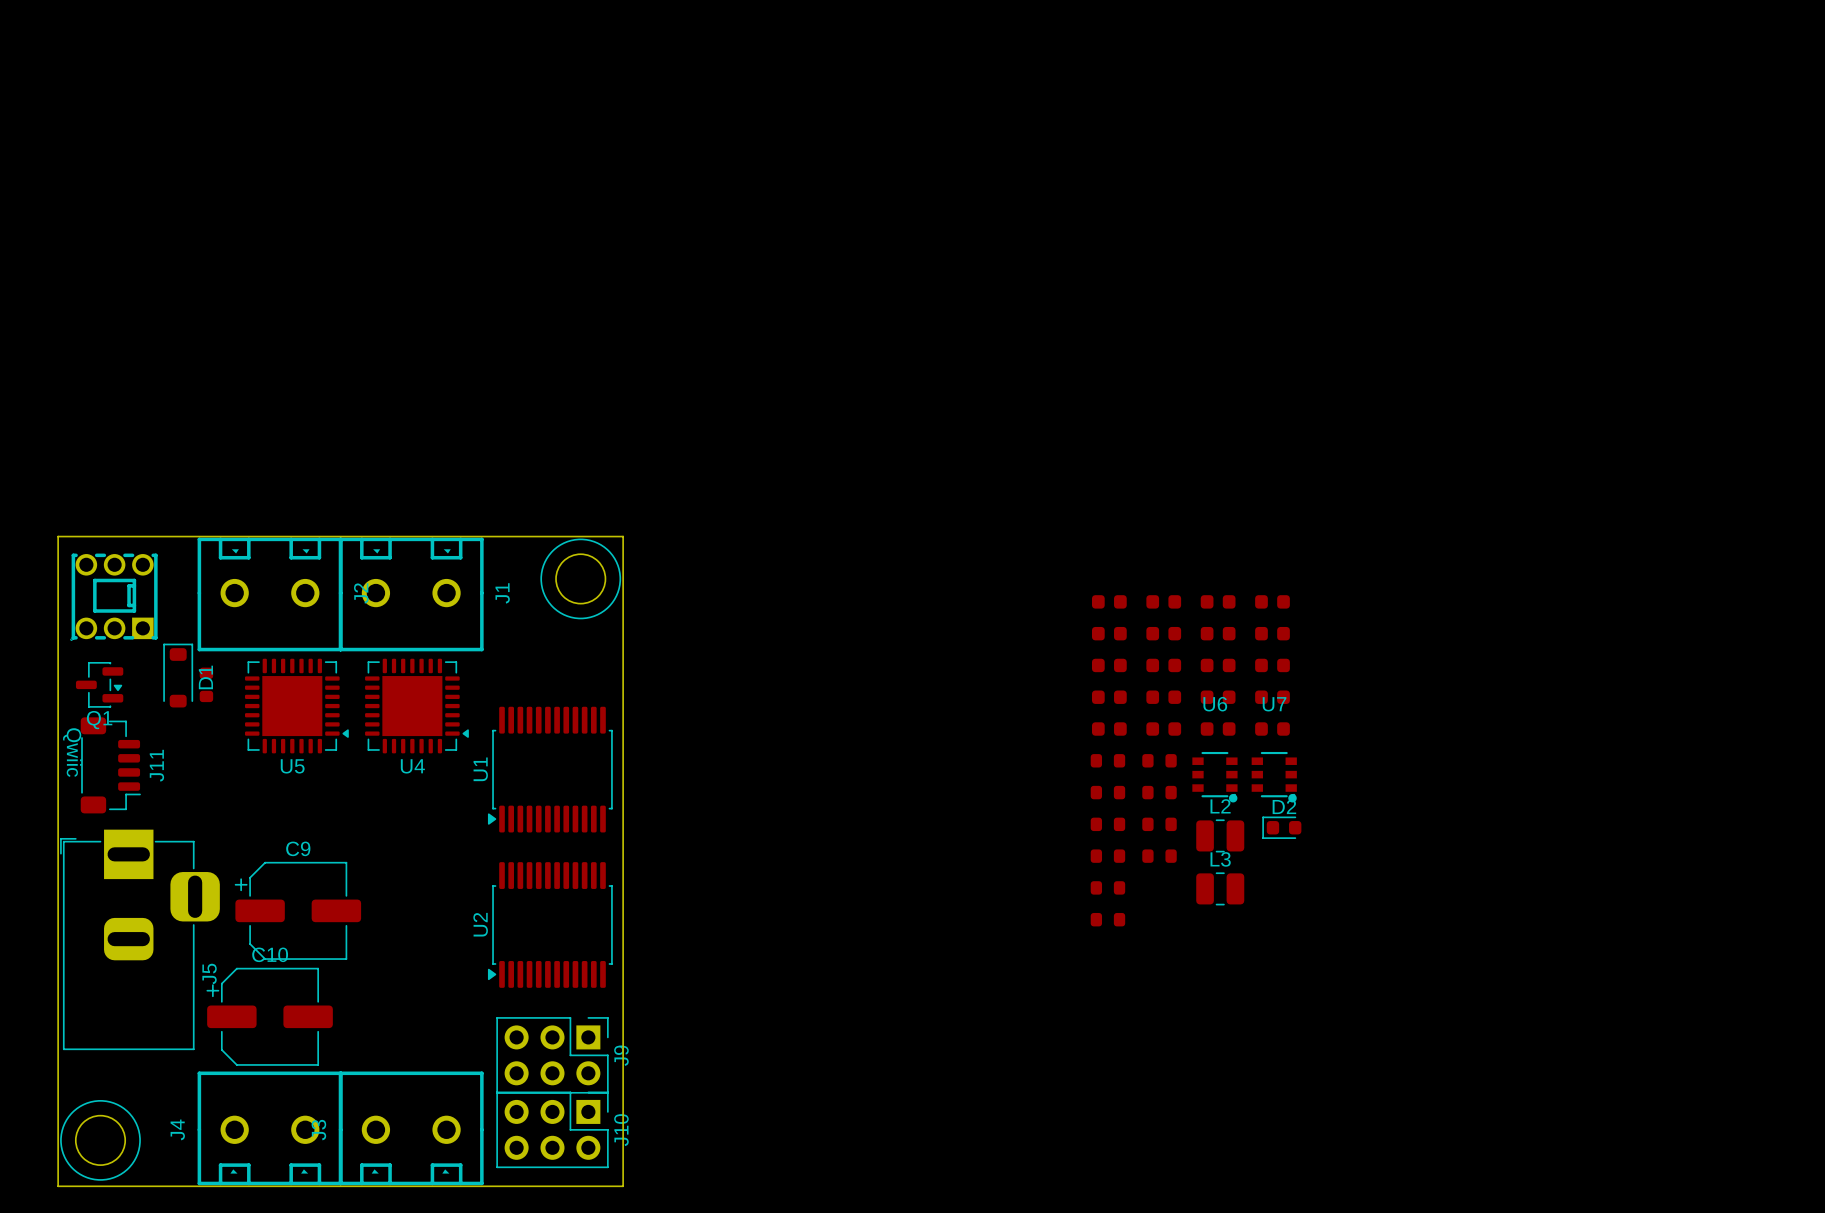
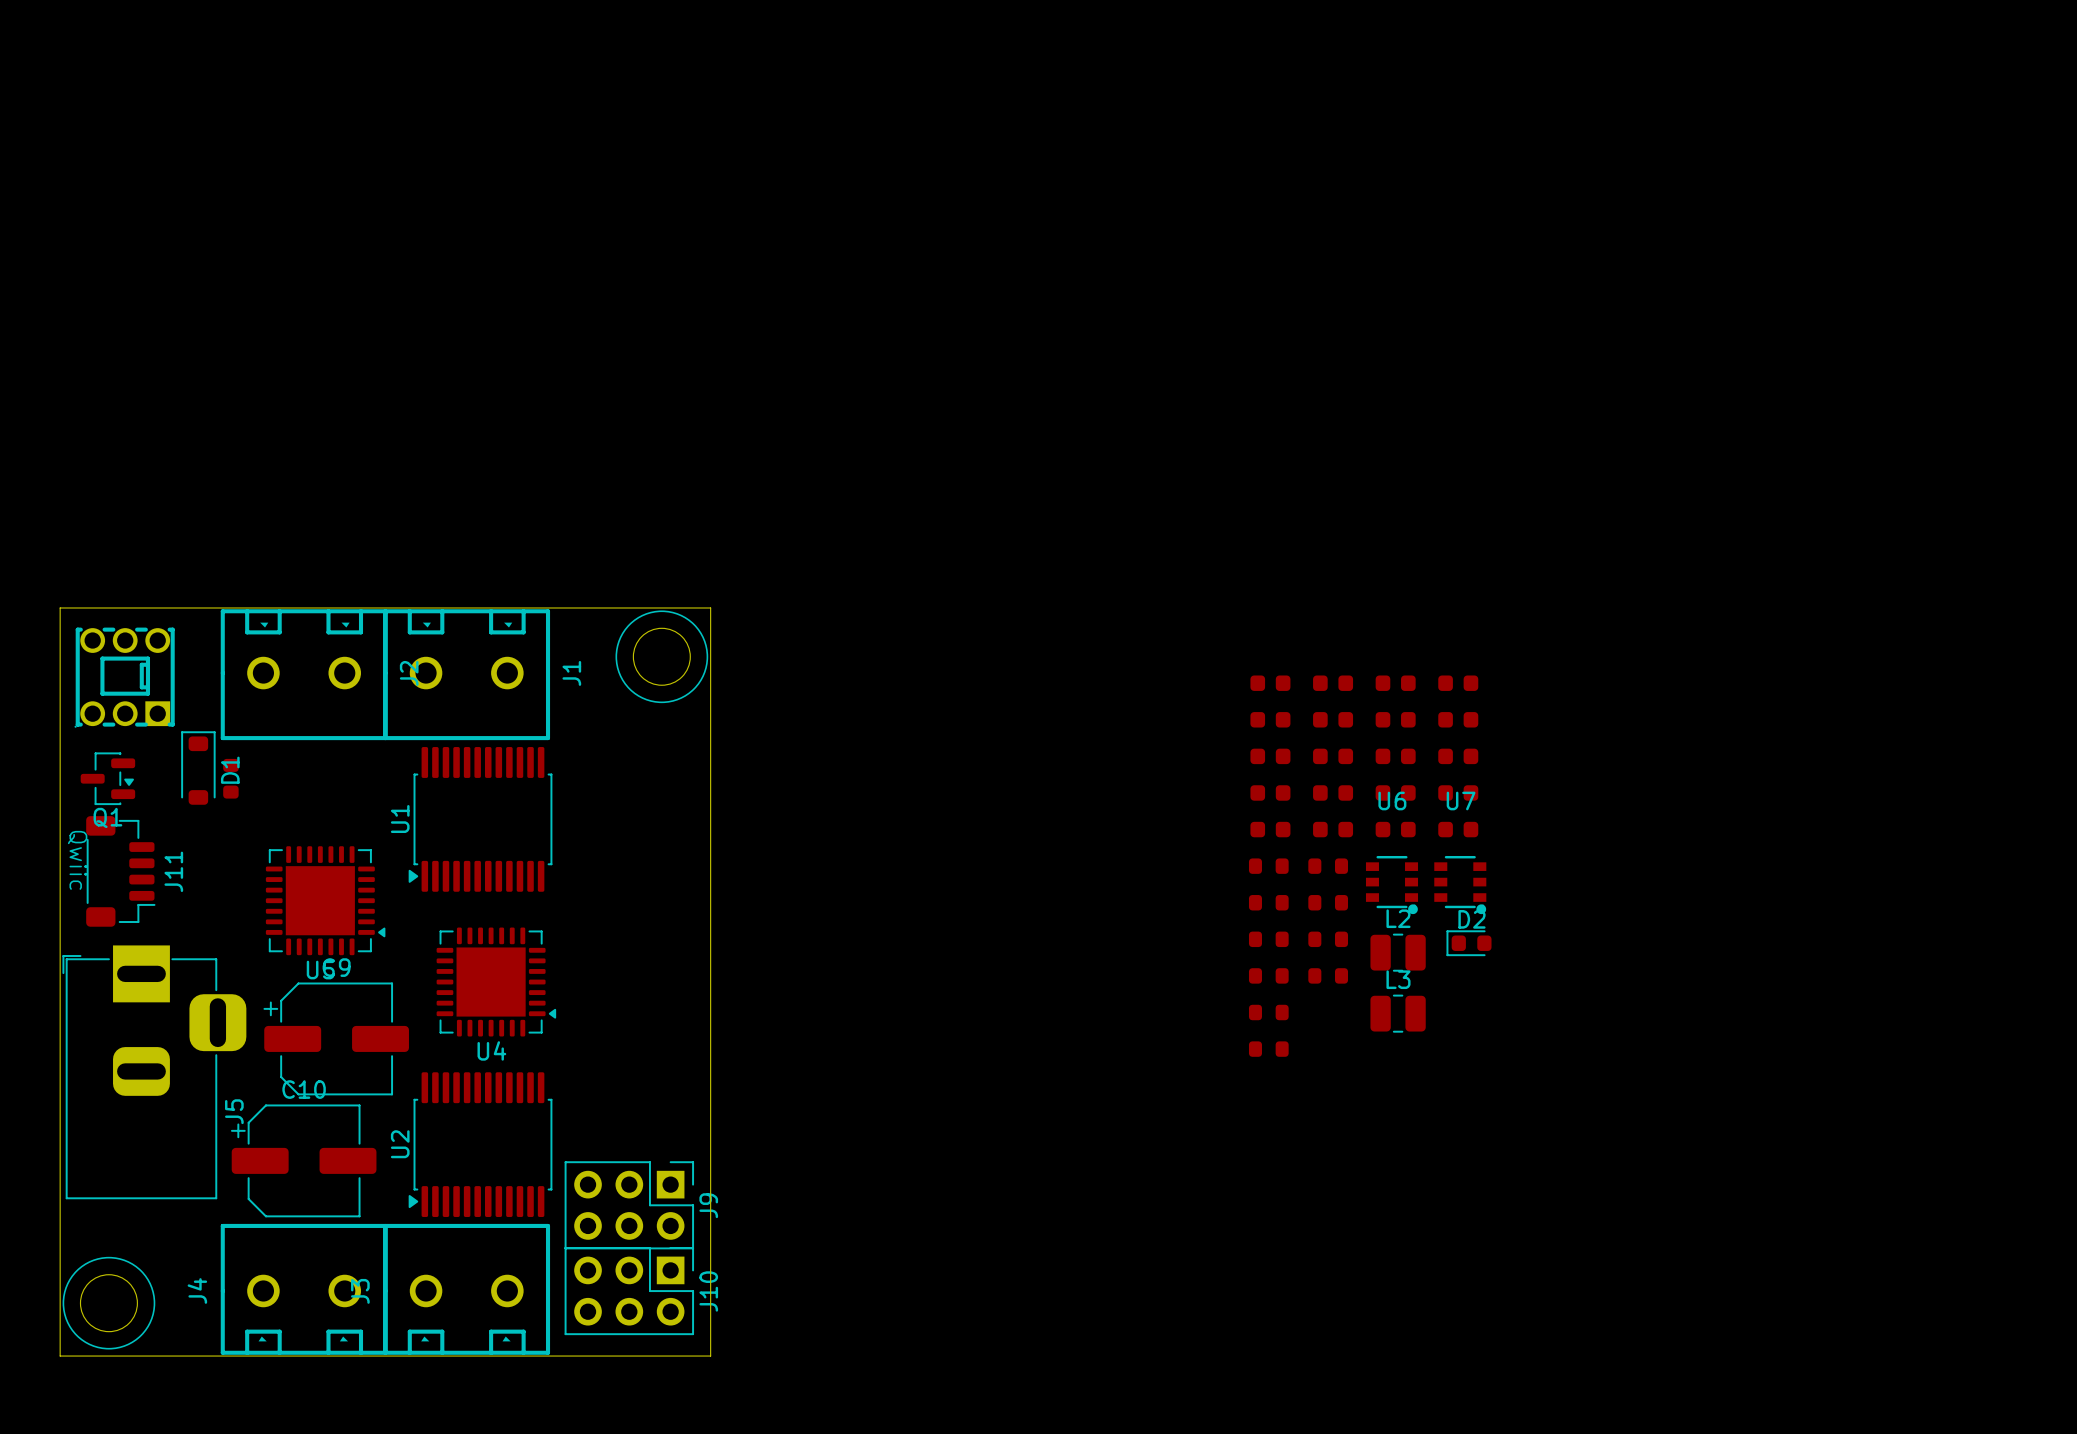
U5 position: (296, 706) -> (325, 900)
U4 position: (416, 706) -> (496, 982)
U1 position: (550, 769) -> (480, 819)
U2 position: (550, 924) -> (480, 1144)

